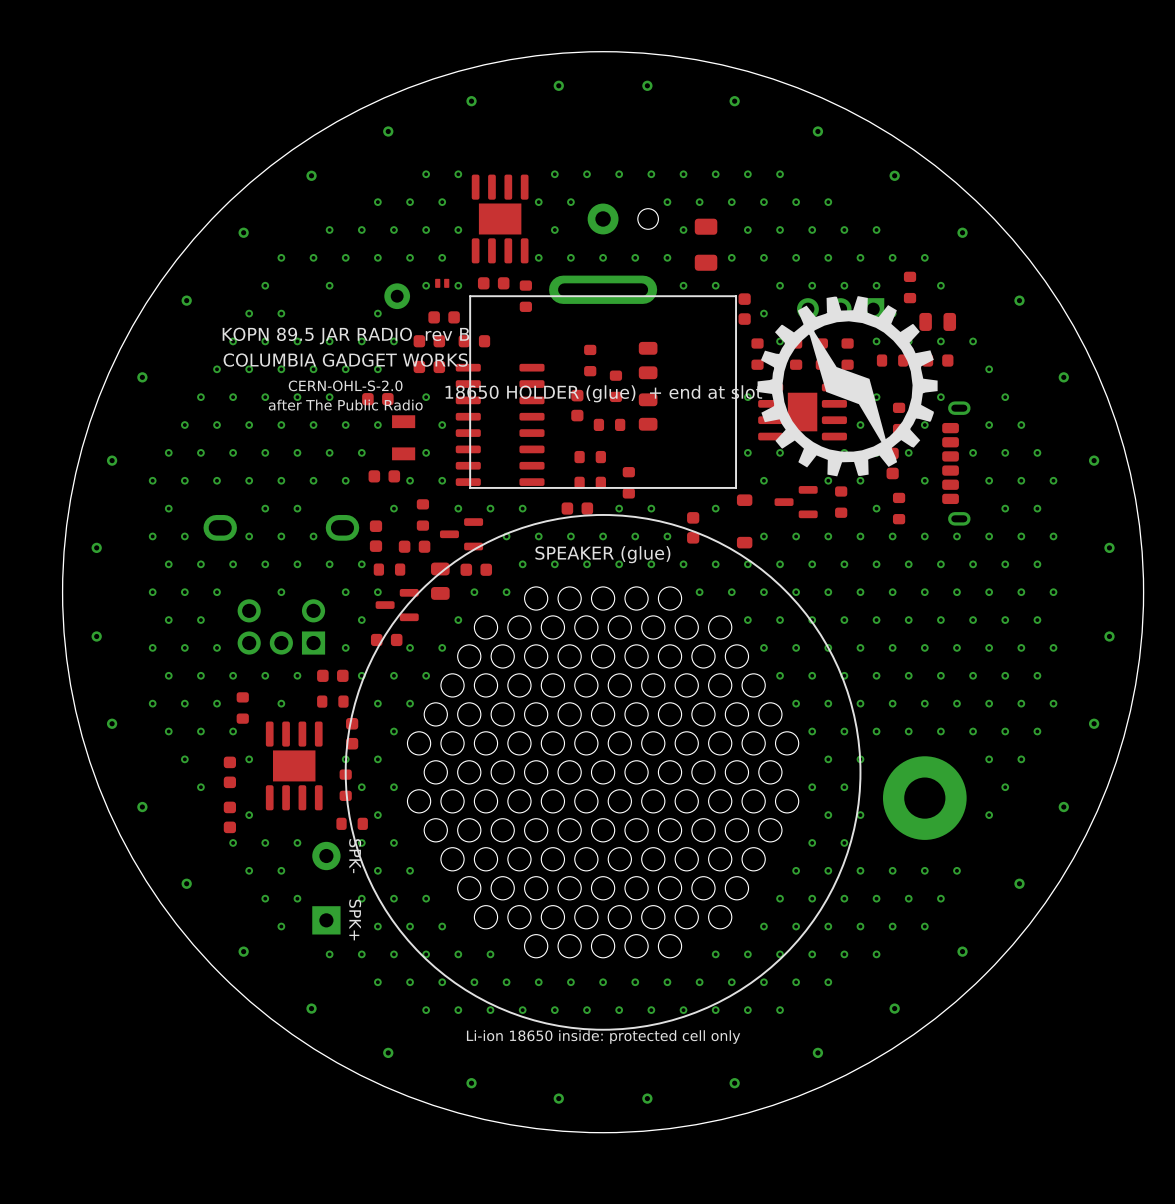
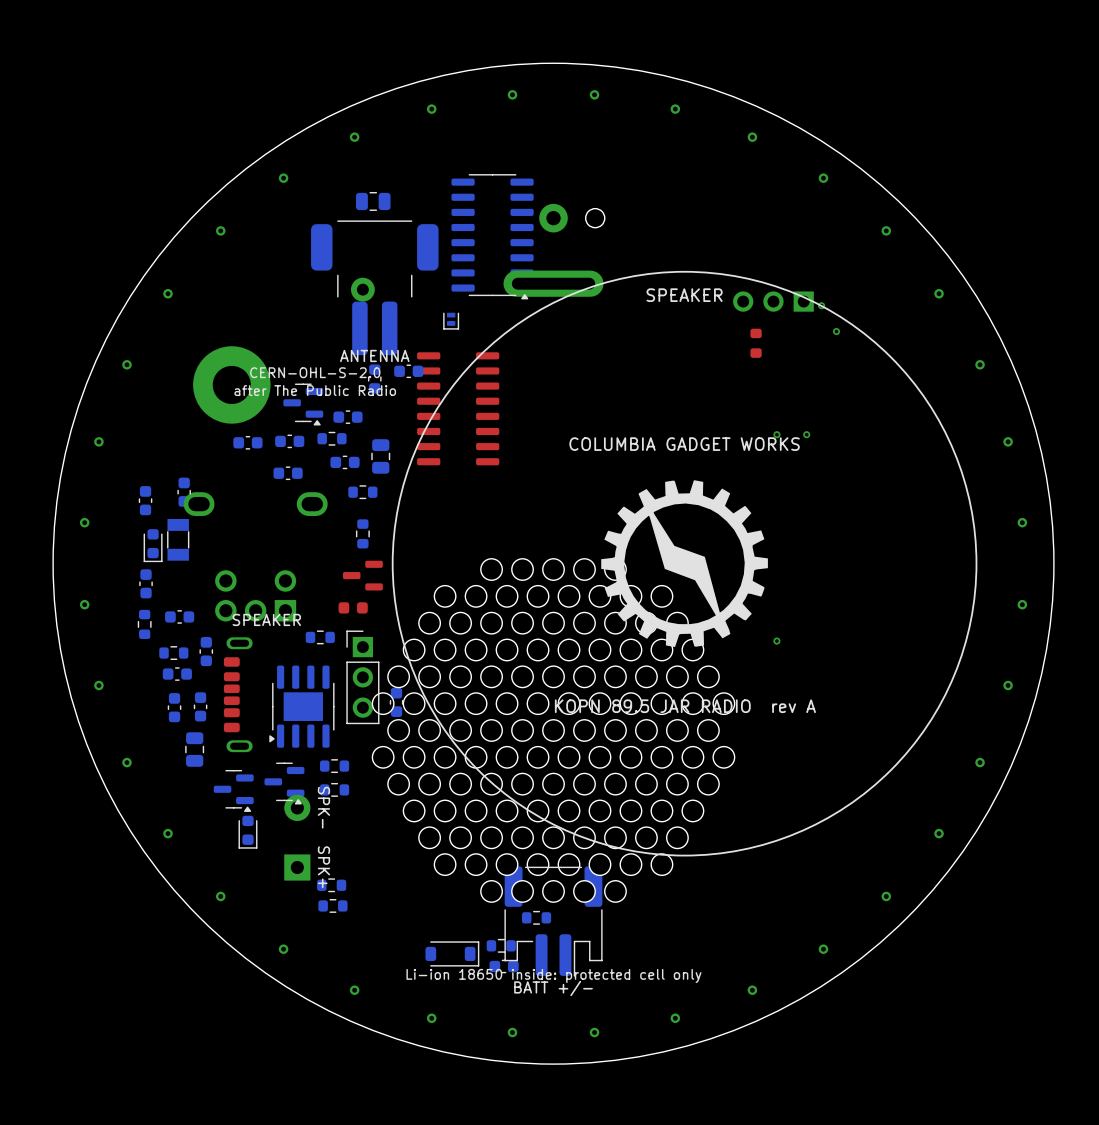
via: (426, 174) -> none
via: (458, 174) -> none
via: (554, 174) -> none
via: (587, 174) -> none
via: (619, 174) -> none
via: (651, 174) -> none
via: (683, 174) -> none
via: (715, 174) -> none
via: (747, 174) -> none
via: (780, 174) -> none
part: none -> (373, 201)
via: (377, 202) -> none
via: (410, 202) -> none
via: (442, 202) -> none
via: (538, 202) -> none
via: (570, 202) -> none
via: (667, 202) -> none
via: (699, 202) -> none
via: (731, 202) -> none
via: (763, 202) -> none
via: (796, 202) -> none
via: (828, 202) -> none
part: (500, 218) -> none
via: (329, 229) -> none
via: (361, 229) -> none
via: (393, 229) -> none
via: (426, 229) -> none
via: (458, 229) -> none
via: (554, 229) -> none
via: (683, 229) -> none
via: (747, 229) -> none
via: (780, 229) -> none
via: (812, 229) -> none
via: (844, 229) -> none
via: (876, 229) -> none
part: none -> (492, 236)
part: (706, 244) -> none
via: (281, 257) -> none
via: (313, 257) -> none
via: (345, 257) -> none
via: (377, 257) -> none
via: (410, 257) -> none
via: (442, 257) -> none
via: (538, 257) -> none
via: (570, 257) -> none
via: (603, 257) -> none
via: (635, 257) -> none
via: (667, 257) -> none
via: (731, 257) -> none
via: (763, 257) -> none
via: (796, 257) -> none
via: (828, 257) -> none
via: (860, 257) -> none
via: (892, 257) -> none
via: (924, 257) -> none
drawing: none -> [391, 270, 978, 857]
part: (442, 283) -> none
part: (493, 283) -> none
via: (265, 285) -> none
via: (329, 285) -> none
via: (426, 285) -> none
via: (458, 285) -> none
via: (683, 285) -> none
via: (715, 285) -> none
via: (780, 285) -> none
via: (812, 285) -> none
via: (844, 285) -> none
via: (876, 285) -> none
via: (940, 285) -> none
part: (910, 287) -> none
part: none -> (374, 287)
drawing: [469, 295, 737, 489] -> none
part: (525, 296) -> none
part: (744, 309) -> none
via: (249, 313) -> none
via: (281, 313) -> none
via: (377, 313) -> none
via: (763, 313) -> none
part: (444, 317) -> none
part: (937, 321) -> none
part: none -> (451, 321)
text: KOPN 89.5 JAR RADIO rev B (345, 335) -> none
via: (233, 341) -> none
via: (265, 341) -> none
via: (297, 341) -> none
via: (329, 341) -> none
via: (361, 341) -> none
via: (393, 341) -> none
part: (429, 341) -> none
part: (474, 341) -> none
via: (780, 341) -> none
via: (876, 341) -> none
via: (940, 341) -> none
via: (973, 341) -> none
part: (757, 354) -> none
part: (796, 354) -> none
part: (847, 354) -> none
text: COLUMBIA GADGET WORKS (345, 360) -> none
part: (590, 360) -> none
part: (648, 360) -> none
part: (892, 360) -> none
part: (937, 360) -> none
part: (429, 366) -> none
text: none -> ANTENNA (374, 355)
via: (217, 369) -> none
via: (249, 369) -> none
via: (281, 369) -> none
via: (313, 369) -> none
via: (345, 369) -> none
via: (377, 369) -> none
via: (989, 369) -> none
part: none -> (408, 371)
part: (615, 386) -> none
drawing position: (847, 386) -> (684, 563)
part: none -> (374, 379)
via: (200, 397) -> none
via: (233, 397) -> none
via: (265, 397) -> none
via: (297, 397) -> none
via: (329, 397) -> none
via: (426, 397) -> none
via: (747, 397) -> none
via: (876, 397) -> none
via: (940, 397) -> none
via: (1005, 397) -> none
part: none -> (231, 384)
part: (377, 399) -> none
part: (577, 405) -> none
part: (648, 412) -> none
part: (802, 412) -> none
part: (899, 418) -> none
part: none -> (303, 404)
part: (609, 424) -> none
via: (184, 425) -> none
via: (217, 425) -> none
via: (249, 425) -> none
via: (281, 425) -> none
via: (313, 425) -> none
via: (345, 425) -> none
via: (377, 425) -> none
via: (442, 425) -> none
via: (860, 425) -> none
via: (924, 425) -> none
via: (989, 425) -> none
via: (1021, 425) -> none
part: none -> (347, 417)
part: (403, 437) -> none
via: (168, 452) -> none
via: (200, 452) -> none
via: (233, 452) -> none
via: (265, 452) -> none
via: (297, 452) -> none
via: (329, 452) -> none
via: (361, 452) -> none
via: (426, 452) -> none
via: (747, 452) -> none
via: (780, 452) -> none
via: (908, 452) -> none
via: (973, 452) -> none
via: (1005, 452) -> none
via: (1037, 452) -> none
part: none -> (332, 438)
part: (590, 457) -> none
part: none -> (289, 441)
part: none -> (247, 442)
text: none -> COLUMBIA GADGET WORKS (684, 444)
part: (892, 463) -> none
part: (956, 463) -> none
part side: top (384, 476) -> bottom (345, 462)
part: none -> (380, 456)
via: (152, 480) -> none
via: (184, 480) -> none
via: (217, 480) -> none
via: (249, 480) -> none
via: (281, 480) -> none
via: (313, 480) -> none
via: (345, 480) -> none
via: (410, 480) -> none
via: (442, 480) -> none
via: (763, 480) -> none
via: (828, 480) -> none
via: (860, 480) -> none
via: (924, 480) -> none
via: (989, 480) -> none
via: (1021, 480) -> none
via: (1053, 480) -> none
part: (590, 482) -> none
part: (628, 482) -> none
part: none -> (288, 473)
part: (796, 502) -> none
part: (841, 502) -> none
via: (168, 508) -> none
via: (265, 508) -> none
via: (297, 508) -> none
via: (393, 508) -> none
via: (458, 508) -> none
via: (490, 508) -> none
via: (522, 508) -> none
part: (577, 508) -> none
via: (619, 508) -> none
via: (651, 508) -> none
via: (715, 508) -> none
via: (876, 508) -> none
part: (899, 508) -> none
via: (1005, 508) -> none
via: (1037, 508) -> none
part: none -> (184, 492)
drawing: [344, 514, 862, 1031] -> none
part: none -> (362, 492)
part: (422, 514) -> none
part: (744, 521) -> none
part: none -> (145, 500)
part: (693, 527) -> none
part: (461, 534) -> none
via: (152, 536) -> none
via: (184, 536) -> none
via: (249, 536) -> none
via: (281, 536) -> none
via: (313, 536) -> none
part: (375, 536) -> none
via: (506, 536) -> none
via: (538, 536) -> none
via: (570, 536) -> none
via: (603, 536) -> none
via: (635, 536) -> none
via: (667, 536) -> none
via: (763, 536) -> none
via: (796, 536) -> none
via: (828, 536) -> none
via: (860, 536) -> none
via: (892, 536) -> none
via: (924, 536) -> none
via: (956, 536) -> none
via: (989, 536) -> none
via: (1021, 536) -> none
via: (1053, 536) -> none
part: (414, 546) -> none
part: none -> (362, 533)
via: (168, 564) -> none
via: (200, 564) -> none
via: (233, 564) -> none
via: (265, 564) -> none
via: (297, 564) -> none
via: (329, 564) -> none
via: (361, 564) -> none
via: (522, 564) -> none
via: (554, 564) -> none
via: (587, 564) -> none
via: (619, 564) -> none
via: (651, 564) -> none
via: (683, 564) -> none
via: (715, 564) -> none
via: (747, 564) -> none
via: (780, 564) -> none
via: (812, 564) -> none
via: (844, 564) -> none
via: (876, 564) -> none
via: (908, 564) -> none
via: (940, 564) -> none
via: (973, 564) -> none
via: (1005, 564) -> none
via: (1037, 564) -> none
part: none -> (178, 539)
part: (389, 569) -> none
part: (476, 569) -> none
part: none -> (153, 545)
part: (440, 581) -> none
via: (152, 592) -> none
via: (184, 592) -> none
via: (217, 592) -> none
via: (281, 592) -> none
via: (345, 592) -> none
via: (377, 592) -> none
via: (474, 592) -> none
via: (506, 592) -> none
via: (699, 592) -> none
via: (731, 592) -> none
via: (763, 592) -> none
via: (796, 592) -> none
via: (828, 592) -> none
via: (860, 592) -> none
via: (892, 592) -> none
via: (924, 592) -> none
via: (956, 592) -> none
via: (989, 592) -> none
via: (1021, 592) -> none
via: (1053, 592) -> none
part: none -> (146, 583)
via: (168, 620) -> none
via: (200, 620) -> none
via: (361, 620) -> none
via: (458, 620) -> none
via: (747, 620) -> none
via: (780, 620) -> none
via: (812, 620) -> none
via: (844, 620) -> none
via: (876, 620) -> none
via: (908, 620) -> none
via: (940, 620) -> none
via: (973, 620) -> none
via: (1005, 620) -> none
via: (1037, 620) -> none
via: (152, 647) -> none
via: (184, 647) -> none
via: (217, 647) -> none
via: (345, 647) -> none
via: (410, 647) -> none
via: (442, 647) -> none
via: (763, 647) -> none
via: (796, 647) -> none
via: (828, 647) -> none
via: (860, 647) -> none
via: (892, 647) -> none
via: (924, 647) -> none
via: (956, 647) -> none
via: (989, 647) -> none
via: (1021, 647) -> none
via: (1053, 647) -> none
part: none -> (179, 616)
text: none -> SPEAKER (266, 619)
part: none -> (144, 624)
part: none -> (320, 637)
via: (168, 675) -> none
via: (200, 675) -> none
via: (233, 675) -> none
via: (265, 675) -> none
via: (297, 675) -> none
part: (332, 675) -> none
via: (361, 675) -> none
via: (393, 675) -> none
via: (426, 675) -> none
via: (780, 675) -> none
via: (812, 675) -> none
via: (876, 675) -> none
via: (908, 675) -> none
via: (940, 675) -> none
via: (973, 675) -> none
via: (1005, 675) -> none
via: (1037, 675) -> none
part: none -> (206, 651)
part: none -> (173, 653)
part: (332, 701) -> none
via: (152, 703) -> none
via: (184, 703) -> none
via: (217, 703) -> none
via: (281, 703) -> none
via: (377, 703) -> none
via: (410, 703) -> none
via: (796, 703) -> none
via: (828, 703) -> none
via: (860, 703) -> none
via: (892, 703) -> none
via: (924, 703) -> none
via: (956, 703) -> none
via: (989, 703) -> none
via: (1021, 703) -> none
via: (1053, 703) -> none
part: (242, 708) -> none
part: none -> (177, 674)
part: none -> (362, 677)
via: (168, 731) -> none
via: (200, 731) -> none
via: (233, 731) -> none
via: (393, 731) -> none
via: (812, 731) -> none
via: (844, 731) -> none
via: (876, 731) -> none
via: (908, 731) -> none
via: (940, 731) -> none
via: (973, 731) -> none
via: (1005, 731) -> none
via: (1037, 731) -> none
part: none -> (238, 694)
part: (352, 733) -> none
part: none -> (396, 702)
part: none -> (200, 706)
part: none -> (301, 706)
part: none -> (174, 707)
text: none -> KOPN 89.5 JAR RADIO rev A (685, 706)
via: (184, 759) -> none
via: (249, 759) -> none
via: (345, 759) -> none
via: (377, 759) -> none
via: (828, 759) -> none
via: (860, 759) -> none
via: (989, 759) -> none
via: (1021, 759) -> none
part: (294, 765) -> none
part: (229, 772) -> none
part: (345, 785) -> none
via: (200, 787) -> none
via: (361, 787) -> none
via: (393, 787) -> none
via: (812, 787) -> none
via: (844, 787) -> none
via: (1005, 787) -> none
part: none -> (194, 749)
part: (924, 798) -> none
part: none -> (334, 766)
via: (249, 815) -> none
via: (377, 815) -> none
via: (828, 815) -> none
via: (860, 815) -> none
via: (989, 815) -> none
part: (229, 817) -> none
part: (352, 823) -> none
part: none -> (284, 783)
part: none -> (334, 789)
part: none -> (233, 790)
via: (233, 842) -> none
via: (265, 842) -> none
via: (297, 842) -> none
via: (361, 842) -> none
via: (393, 842) -> none
via: (812, 842) -> none
via: (844, 842) -> none
via: (249, 870) -> none
via: (281, 870) -> none
via: (377, 870) -> none
via: (410, 870) -> none
via: (796, 870) -> none
via: (828, 870) -> none
via: (860, 870) -> none
via: (892, 870) -> none
via: (924, 870) -> none
via: (956, 870) -> none
part: none -> (247, 832)
via: (265, 898) -> none
via: (297, 898) -> none
via: (361, 898) -> none
via: (393, 898) -> none
via: (426, 898) -> none
via: (780, 898) -> none
via: (812, 898) -> none
via: (844, 898) -> none
via: (876, 898) -> none
via: (908, 898) -> none
via: (940, 898) -> none
via: (281, 926) -> none
via: (377, 926) -> none
via: (410, 926) -> none
via: (442, 926) -> none
via: (763, 926) -> none
via: (796, 926) -> none
via: (828, 926) -> none
via: (860, 926) -> none
via: (892, 926) -> none
via: (924, 926) -> none
part: none -> (331, 885)
via: (329, 954) -> none
via: (361, 954) -> none
via: (393, 954) -> none
via: (426, 954) -> none
via: (458, 954) -> none
via: (490, 954) -> none
via: (715, 954) -> none
via: (747, 954) -> none
via: (780, 954) -> none
via: (812, 954) -> none
via: (844, 954) -> none
via: (876, 954) -> none
part: none -> (332, 905)
part: none -> (536, 917)
part: none -> (553, 921)
via: (377, 982) -> none
via: (410, 982) -> none
via: (442, 982) -> none
via: (474, 982) -> none
via: (506, 982) -> none
via: (538, 982) -> none
via: (570, 982) -> none
via: (603, 982) -> none
via: (635, 982) -> none
via: (667, 982) -> none
via: (699, 982) -> none
via: (731, 982) -> none
via: (763, 982) -> none
via: (796, 982) -> none
via: (828, 982) -> none
part: none -> (501, 945)
via: (426, 1010) -> none
via: (458, 1010) -> none
via: (490, 1010) -> none
via: (522, 1010) -> none
via: (554, 1010) -> none
via: (587, 1010) -> none
via: (619, 1010) -> none
via: (651, 1010) -> none
via: (683, 1010) -> none
via: (715, 1010) -> none
via: (747, 1010) -> none
via: (780, 1010) -> none
part: none -> (452, 953)
part: none -> (504, 966)
text: none -> BATT +/- (553, 988)

